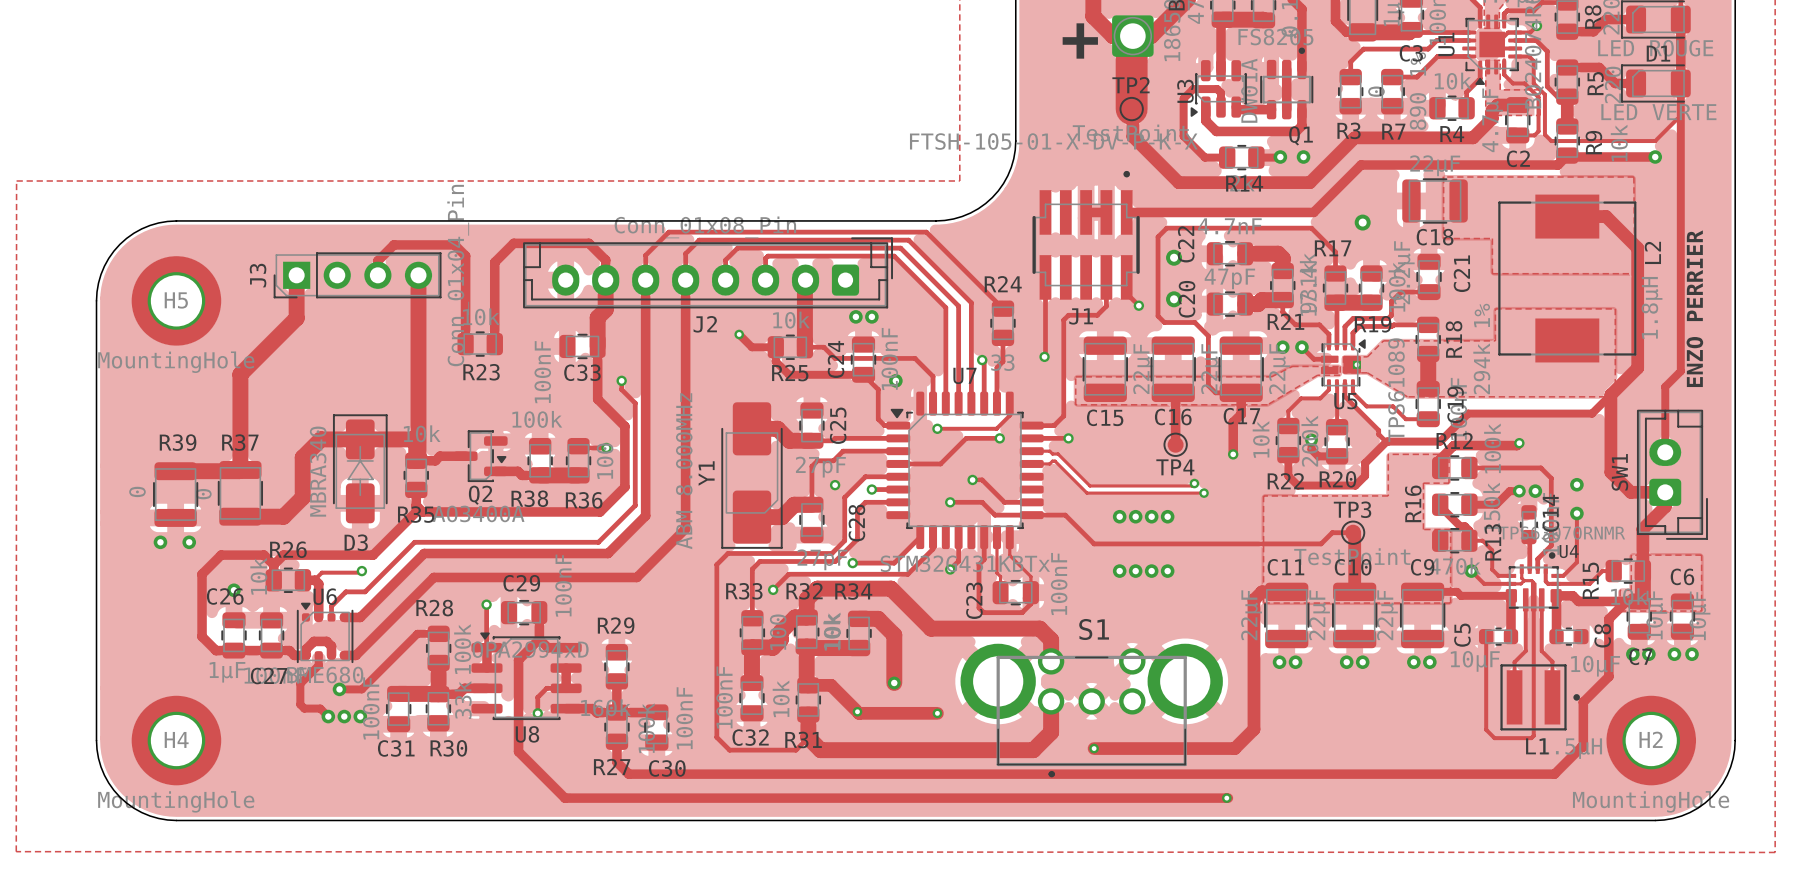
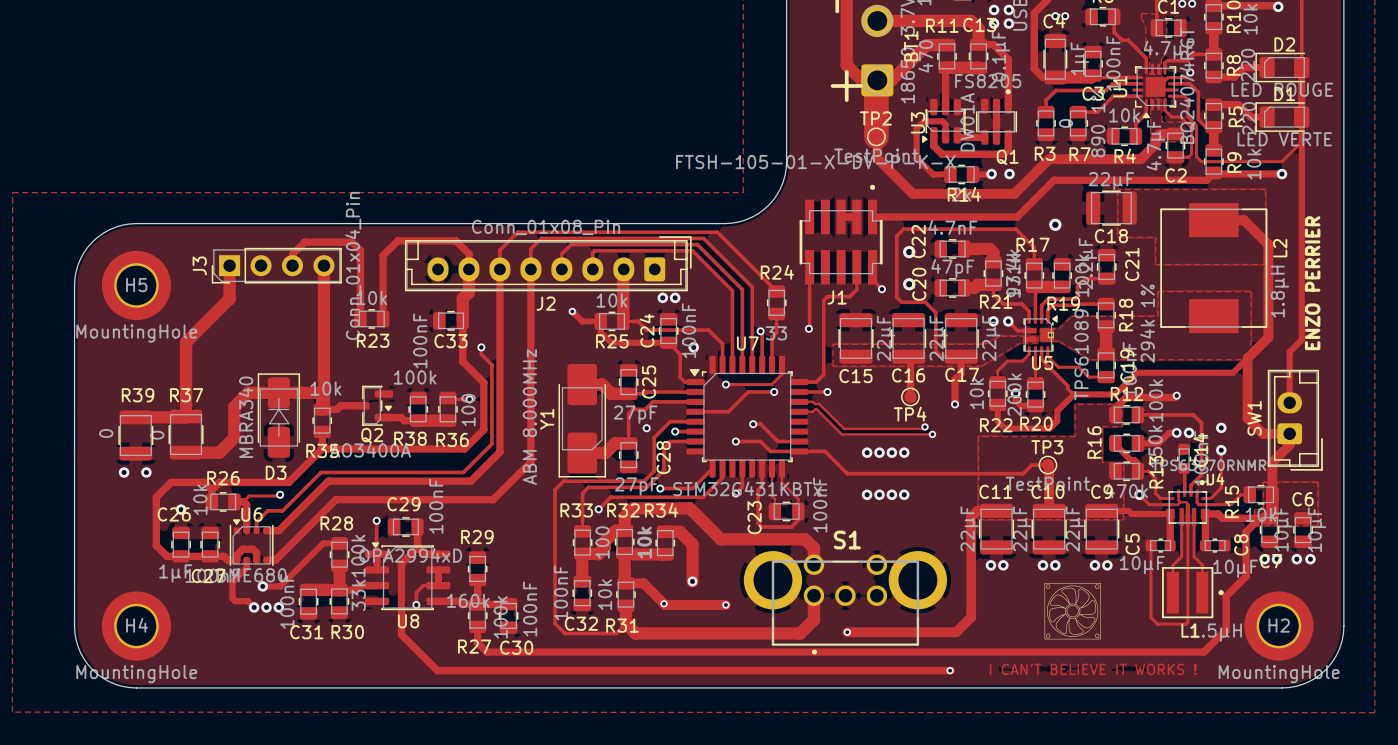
drawing: none -> [1044, 583, 1101, 640]
text: none -> I CAN'T BELIEVE IT WORKS ! (1093, 669)

